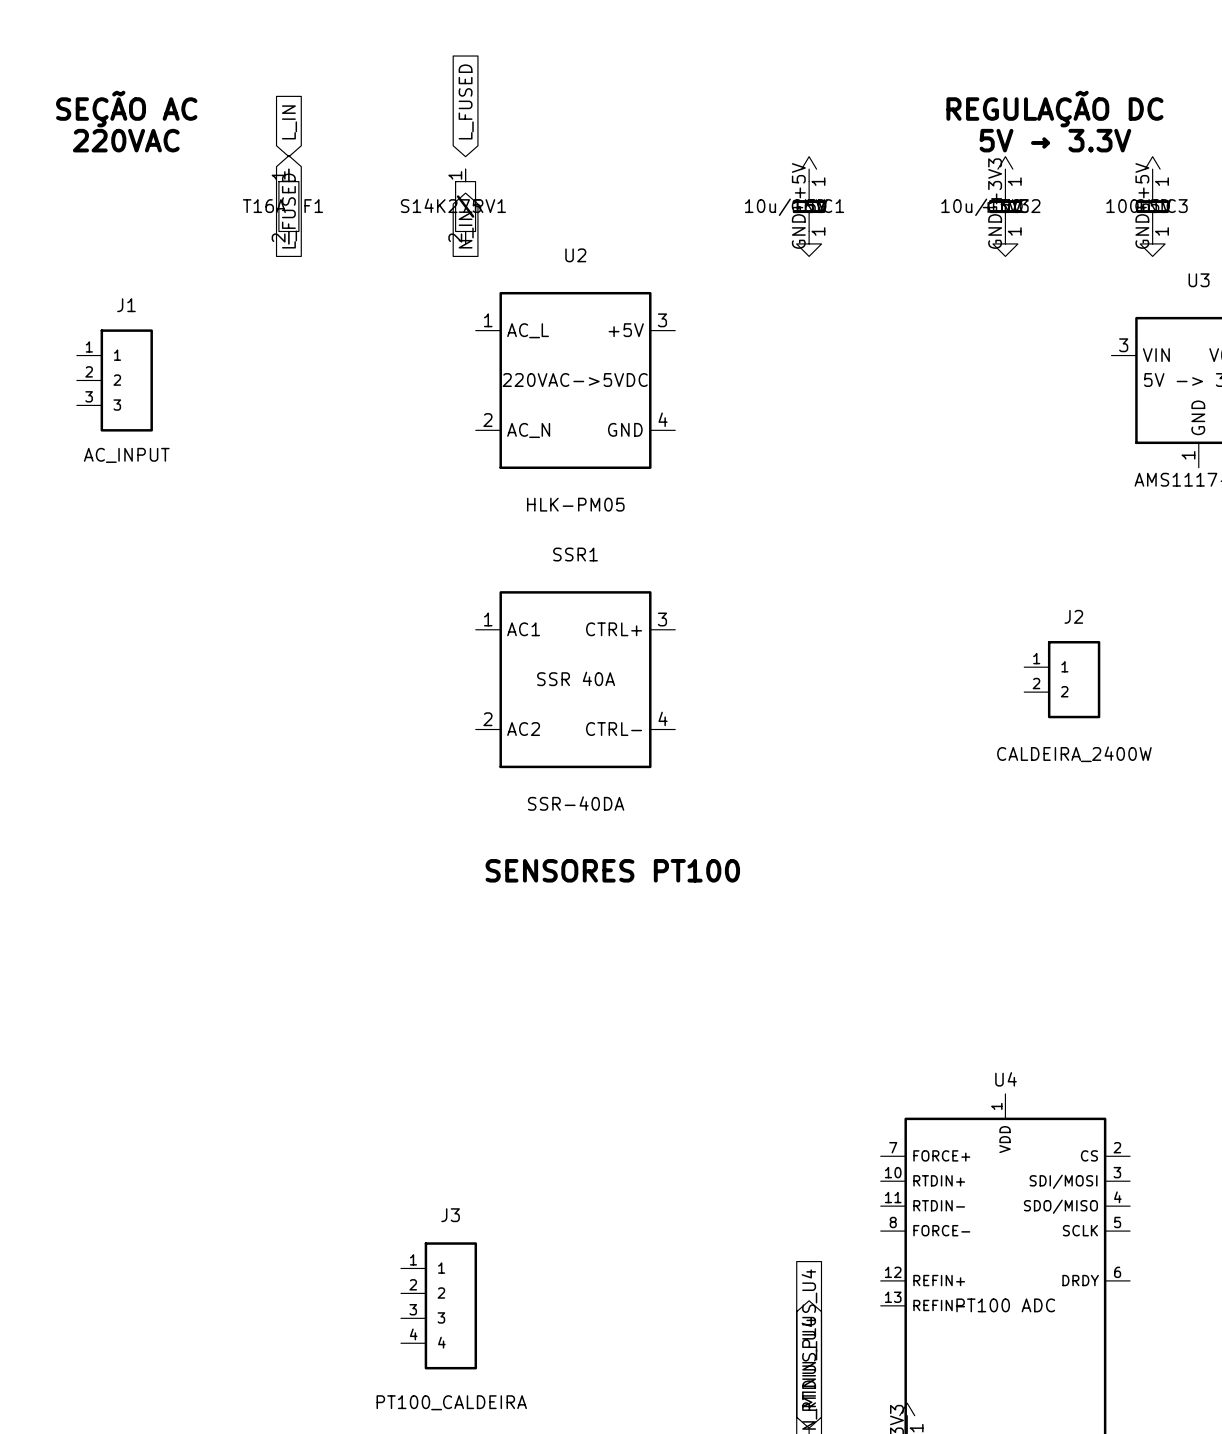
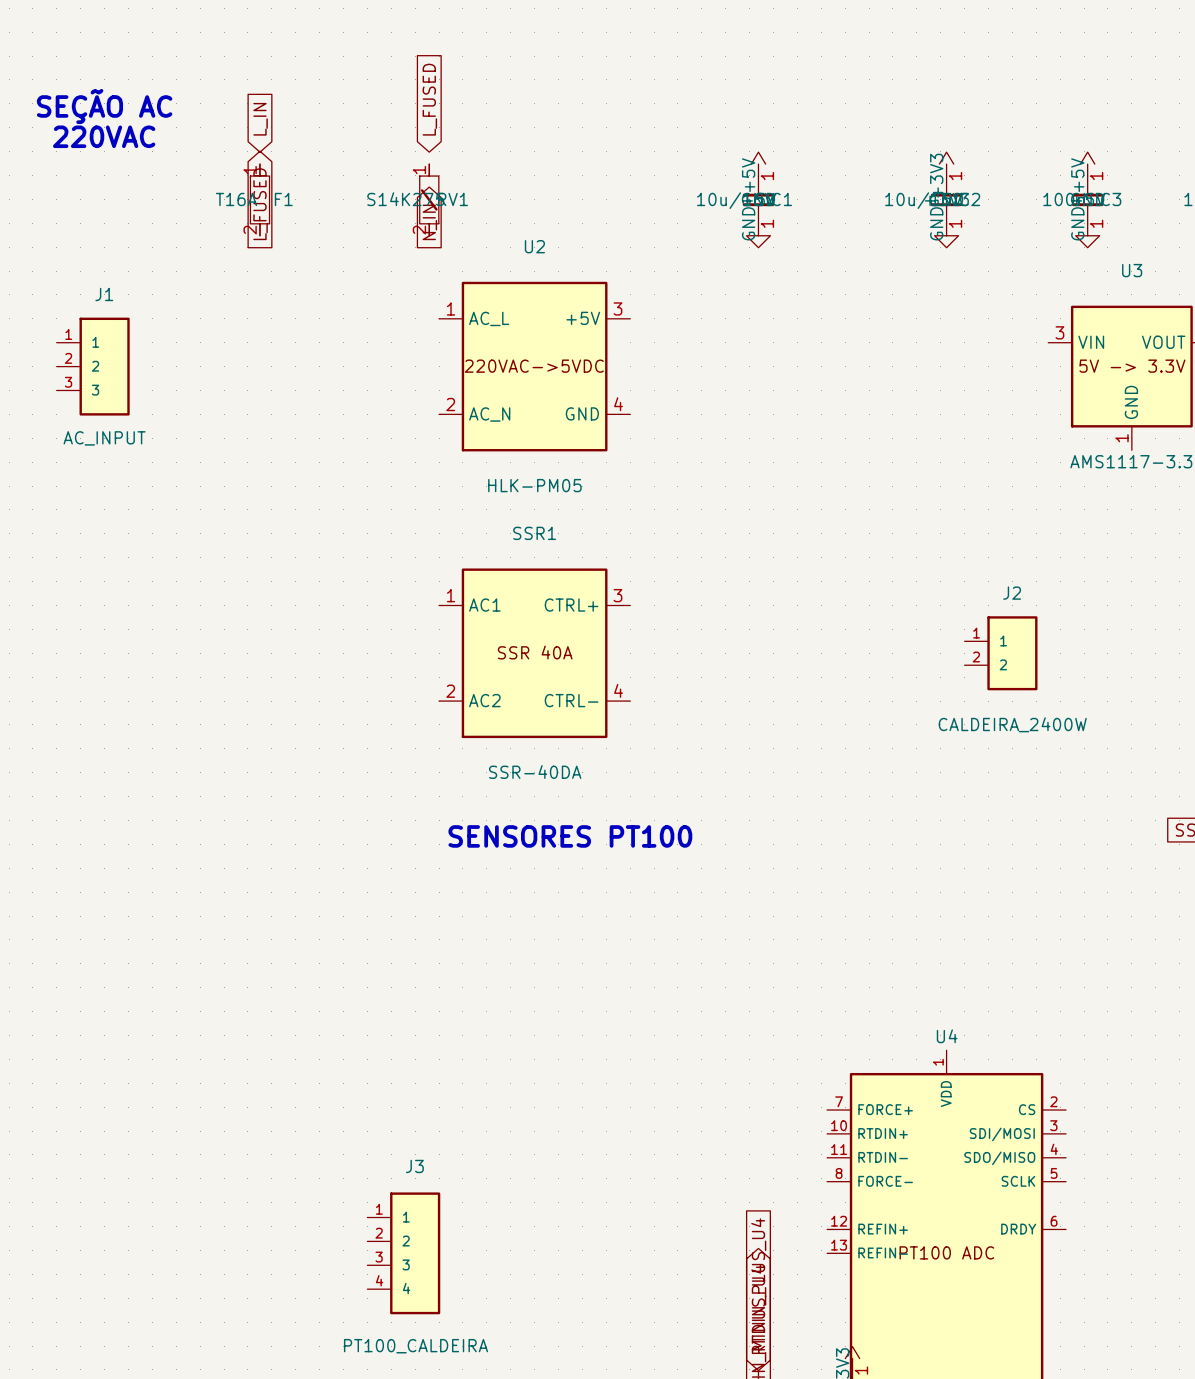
text: REGULAÇÃO DC (1054, 109) -> none
text: 5V → 3.3V (1055, 140) -> none

